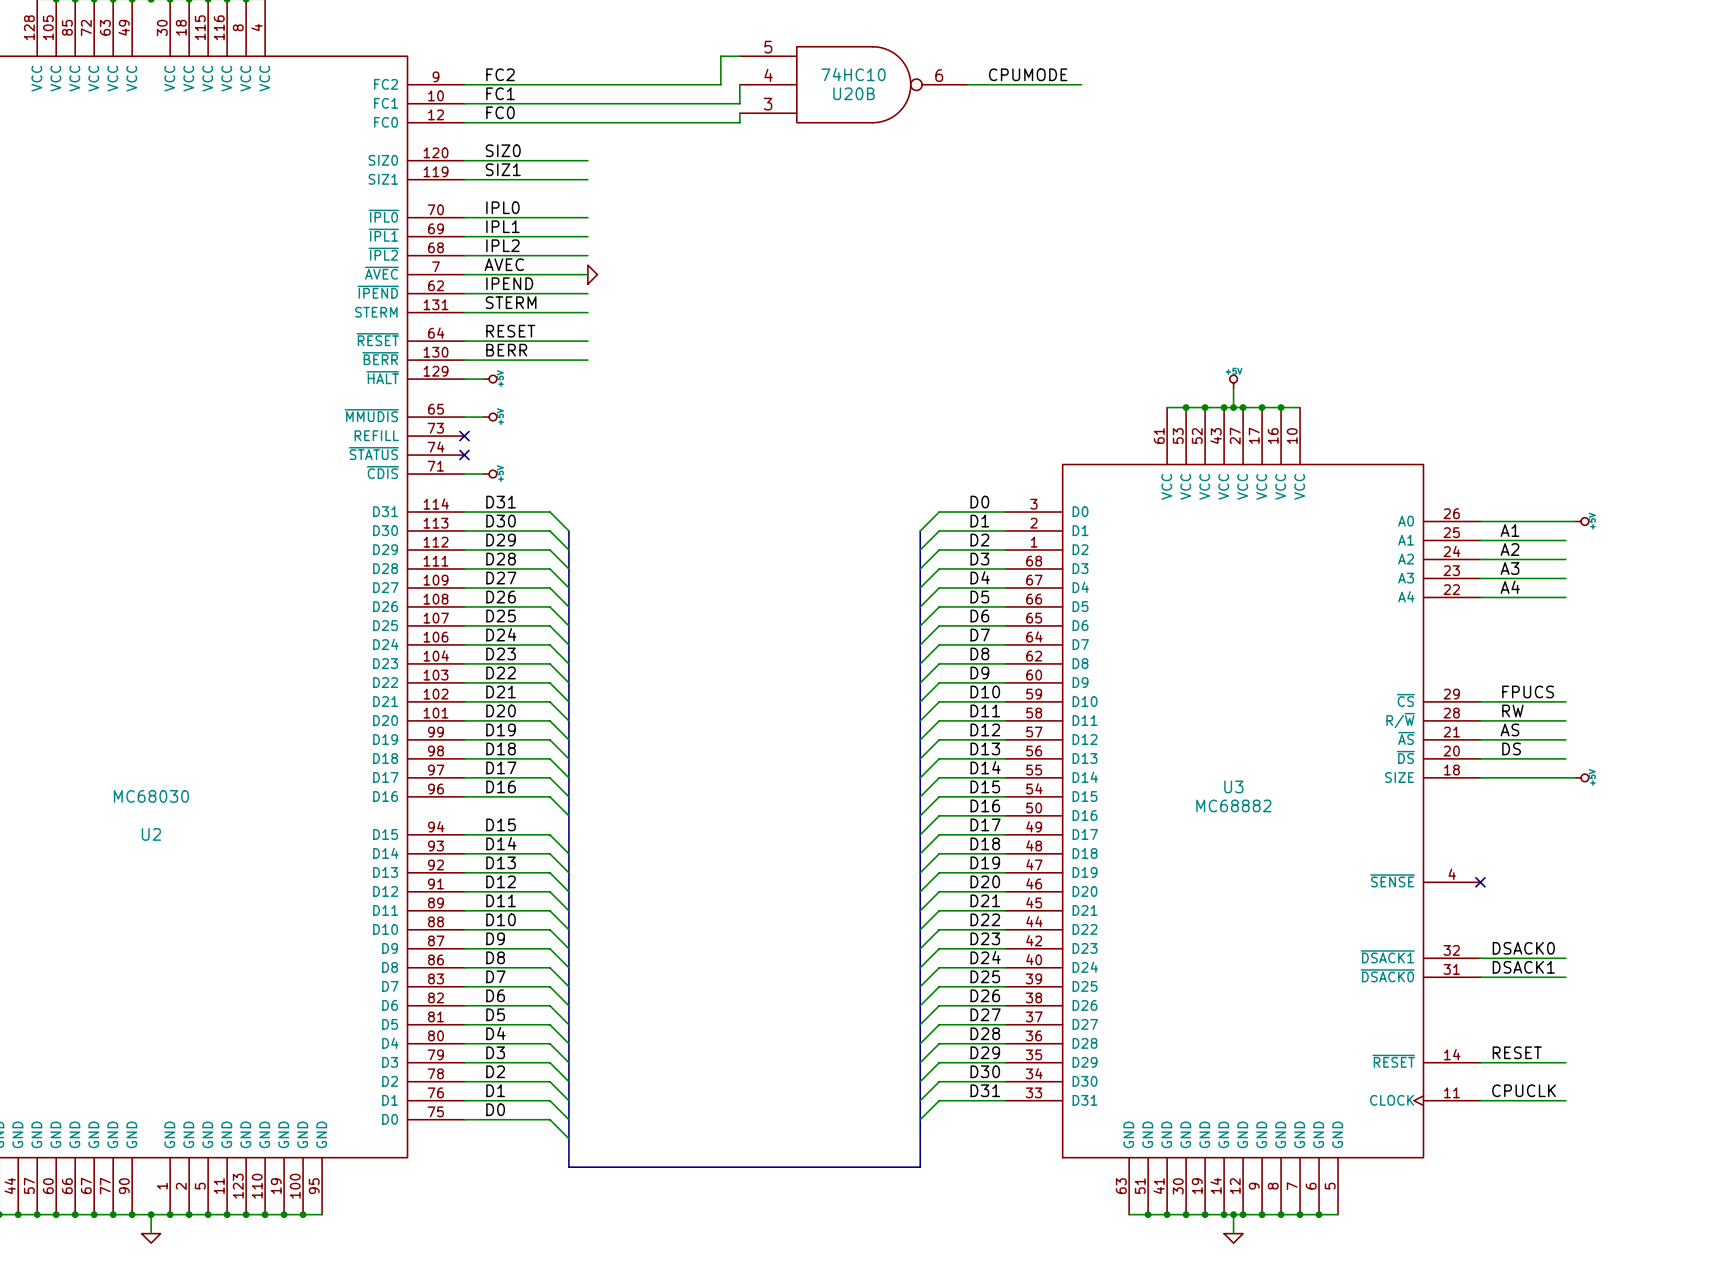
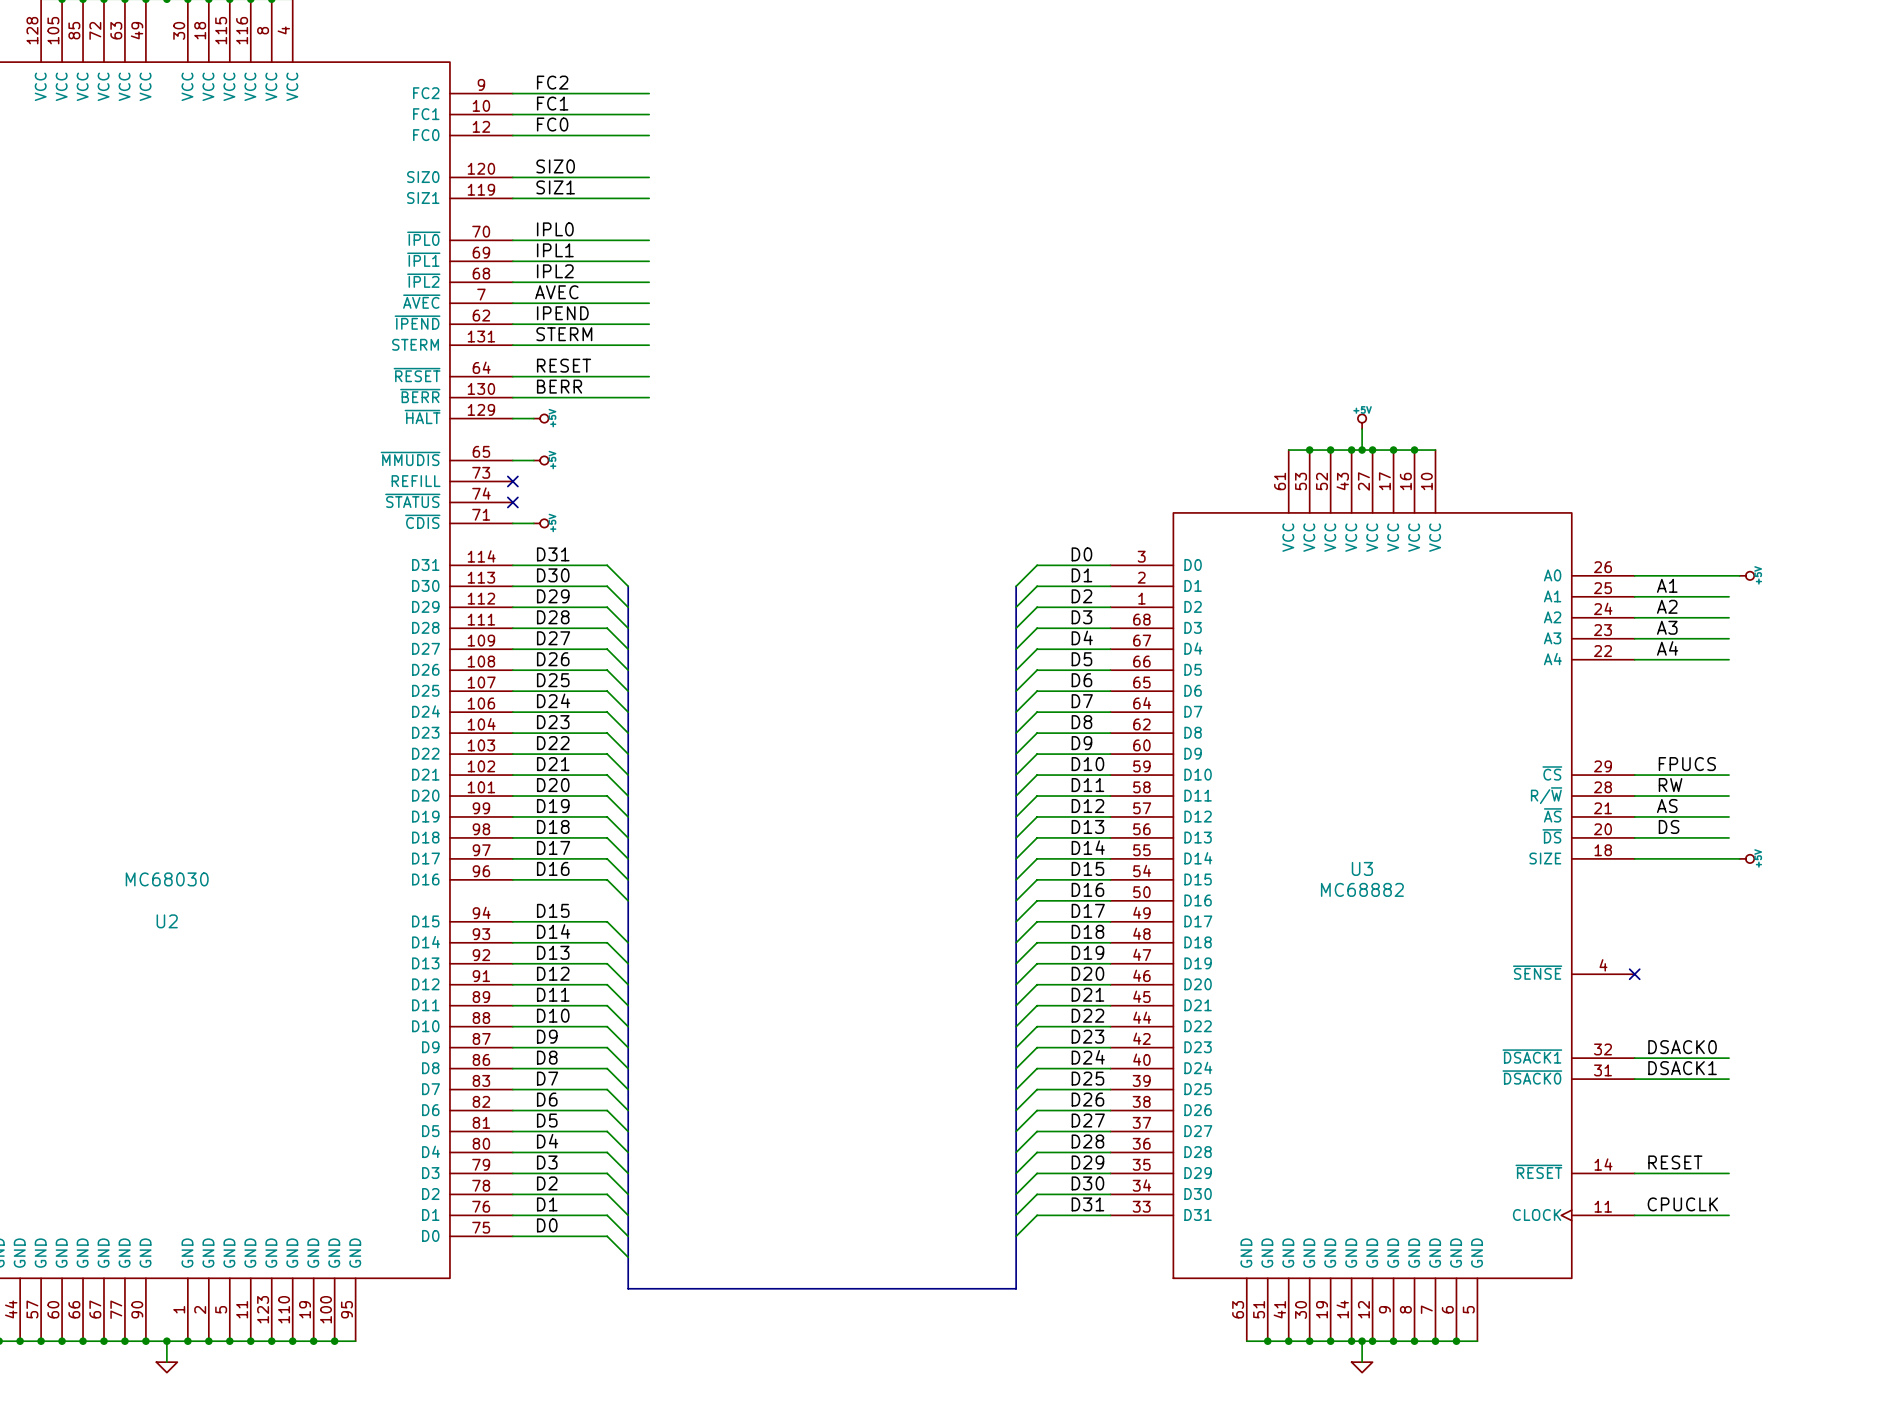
wire: (739, 56) (720, 56) (720, 84) (587, 84) -> none
label: CPUMODE (1028, 74) -> none
wire: (739, 84) (739, 103) (587, 103) -> none
U20B: 74HC10 (853, 84) -> none
wire: (967, 84) (1081, 84) -> none
wire: (739, 113) (739, 122) (587, 122) -> none
power symbol: (592, 274) -> none

